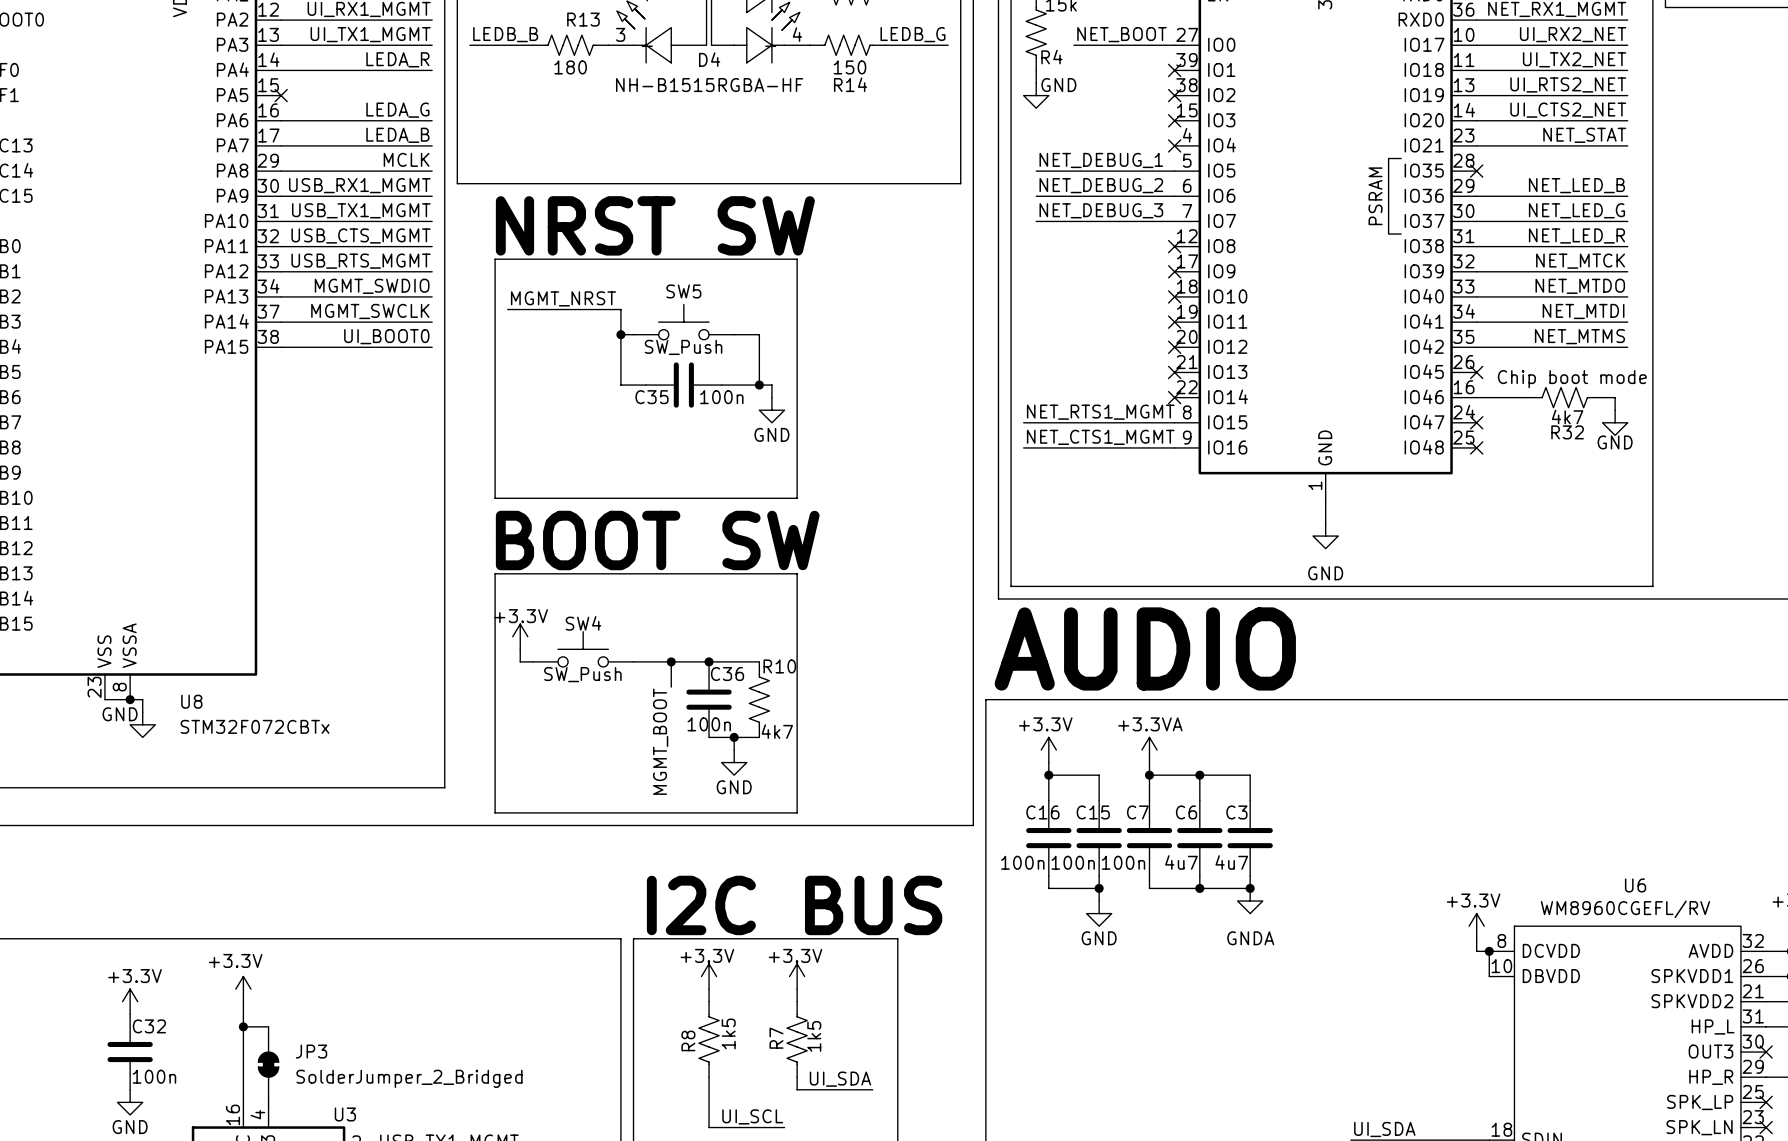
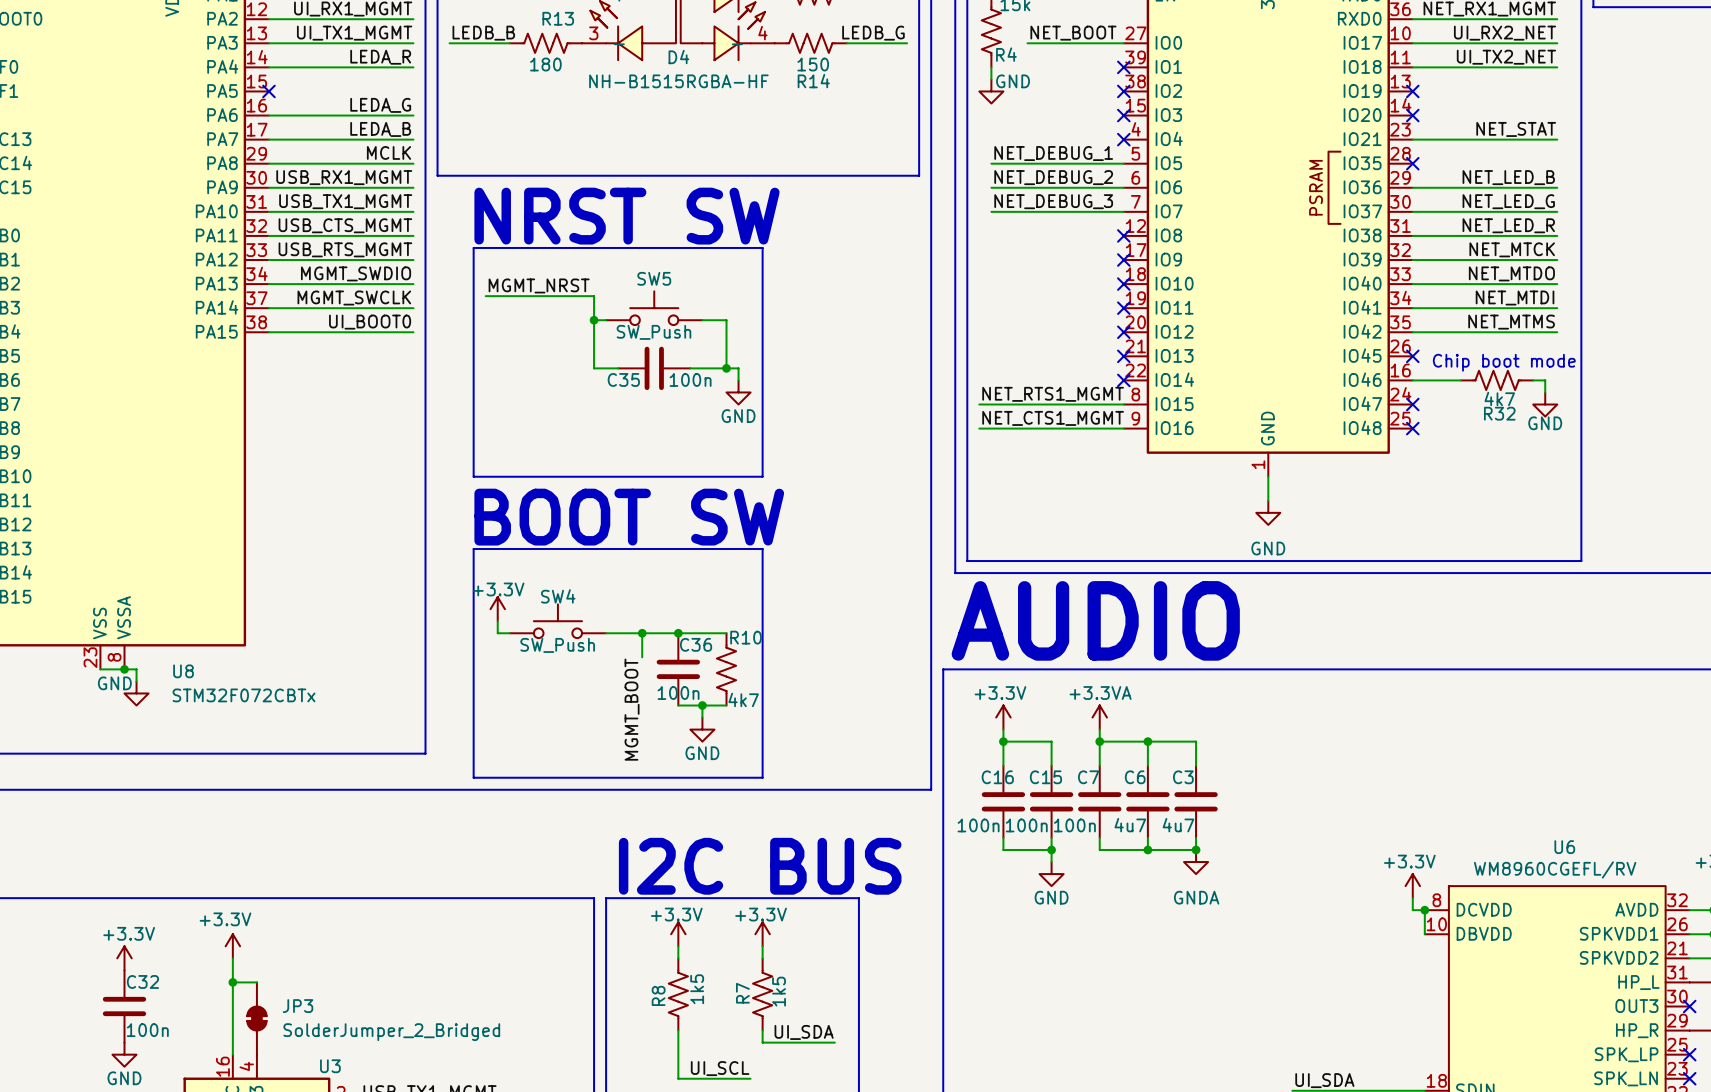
label: UI_RTS2_NET (1568, 84) -> none
wire: (1476, 95) (1627, 95) -> none
no-connect mark: none -> (1412, 91)
label: UI_CTS2_NET (1568, 110) -> none
wire: (1476, 120) (1627, 120) -> none
no-connect mark: none -> (1412, 115)

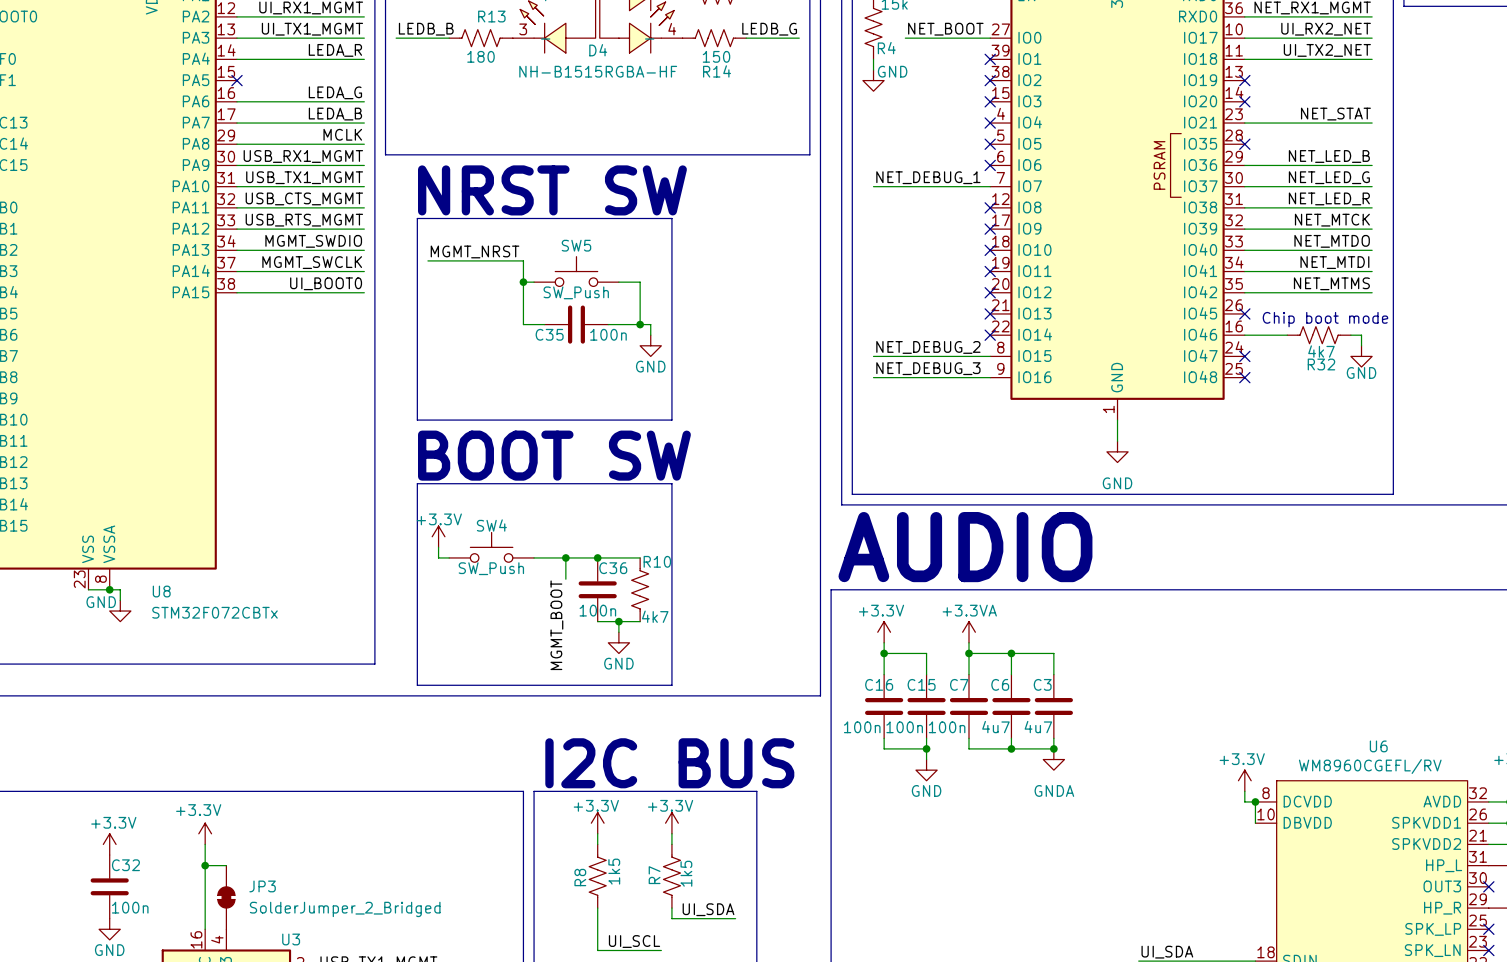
label: NET_DEBUG_1 (1053, 153) -> none
wire: (991, 163) (1123, 163) -> none
no-connect mark: none -> (990, 144)
label position: NET_DEBUG_2 (1053, 177) -> NET_DEBUG_2 (928, 347)
wire: (991, 187) (1123, 187) -> none
no-connect mark: none -> (990, 165)
label: NET_DEBUG_3 (1053, 201) -> NET_DEBUG_1 (928, 177)
label: NET_RTS1_MGMT (1053, 394) -> none
wire: (979, 404) (991, 404) -> none
label: NET_CTS1_MGMT (1053, 418) -> none
label: none -> NET_DEBUG_3 (928, 368)
wire: (979, 428) (991, 428) -> none

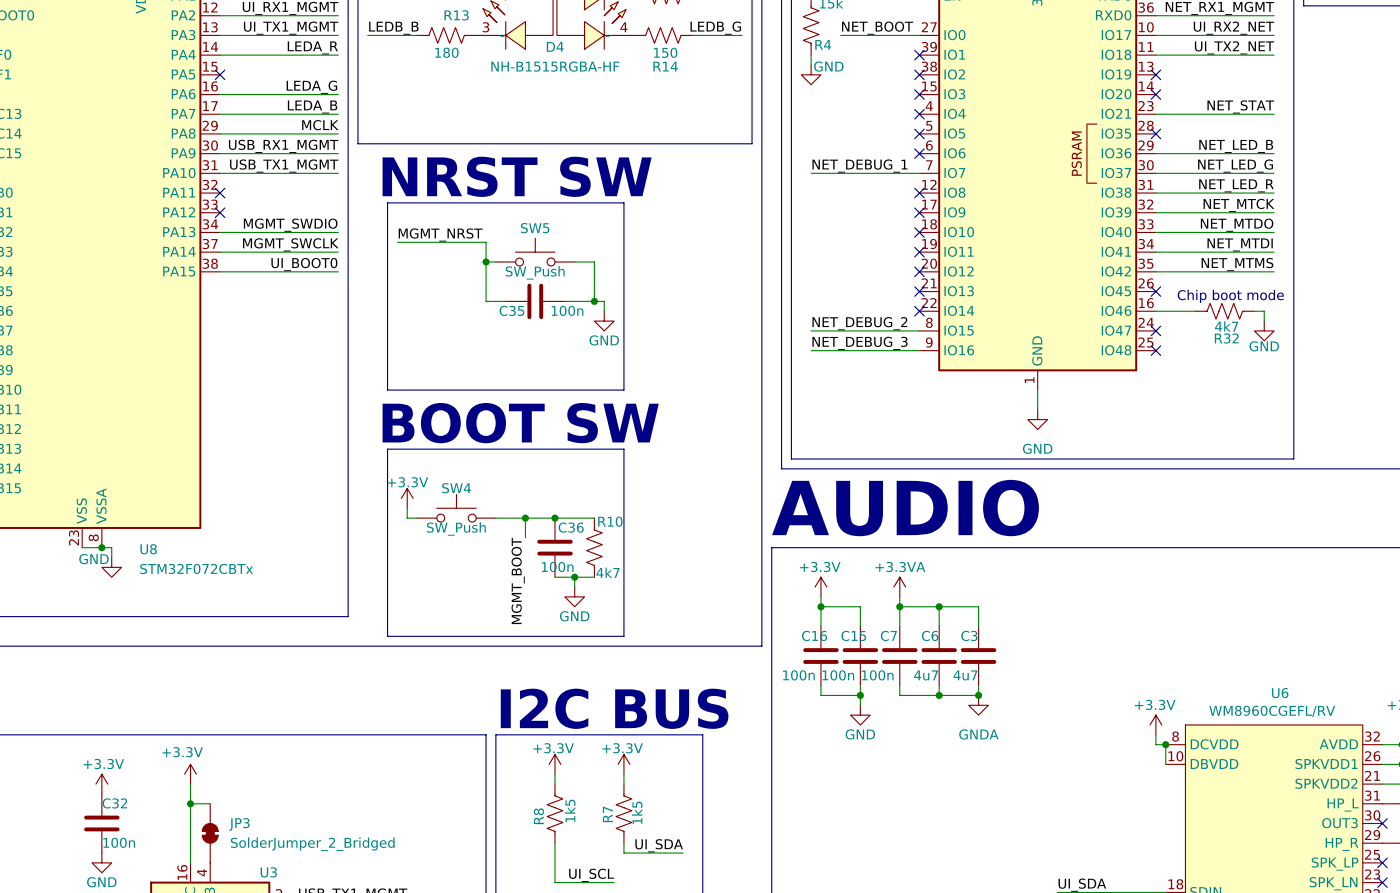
label: USB_CTS_MGMT (304, 198) -> none
wire: (237, 207) (364, 207) -> none
no-connect mark: none -> (220, 193)
label: USB_RTS_MGMT (304, 220) -> none
wire: (237, 229) (364, 229) -> none
no-connect mark: none -> (220, 212)

